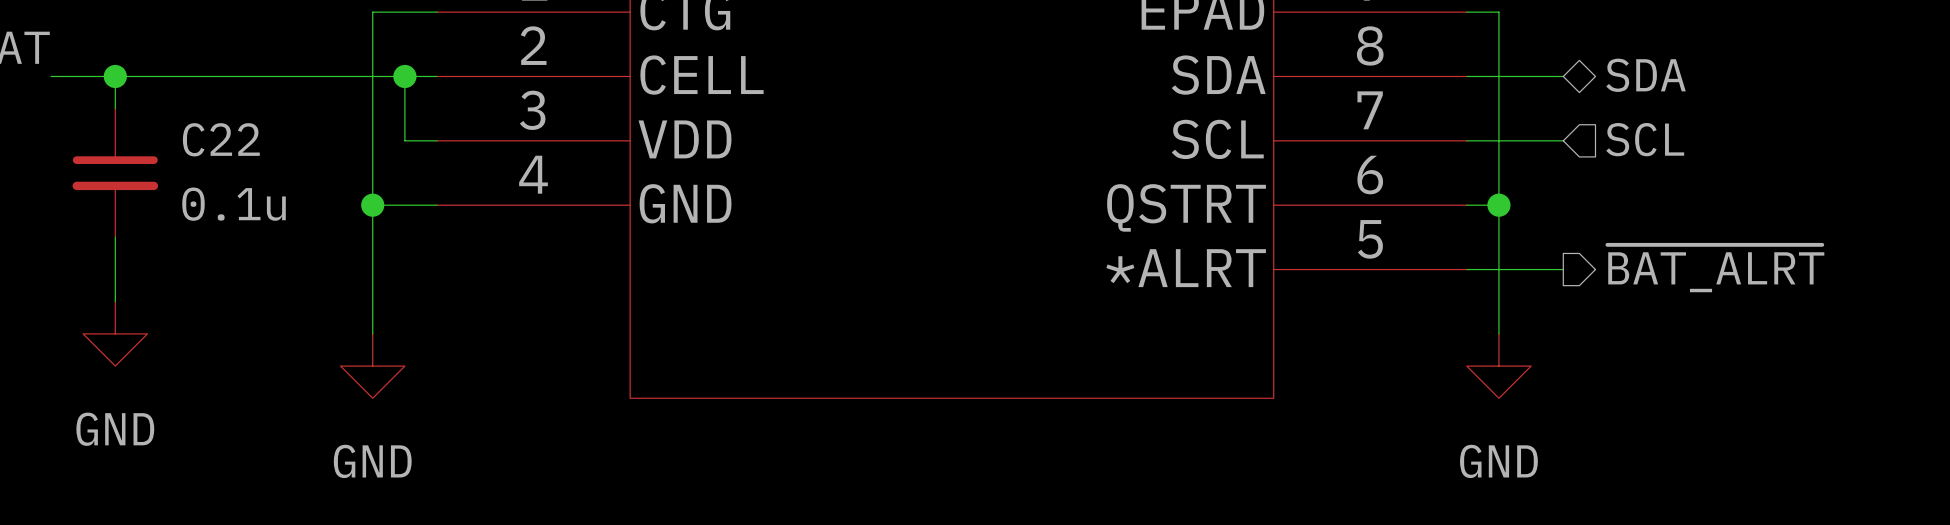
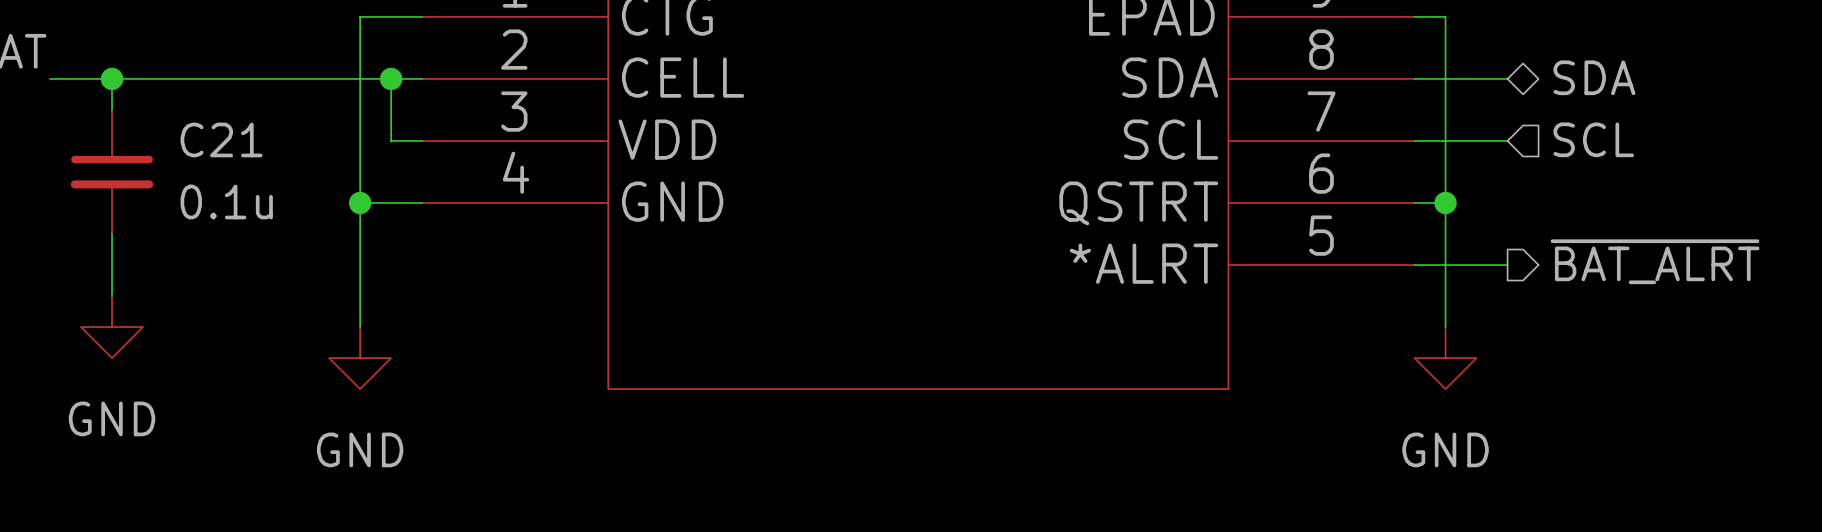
C22 name: C22 (221, 139) -> C21 (221, 139)

